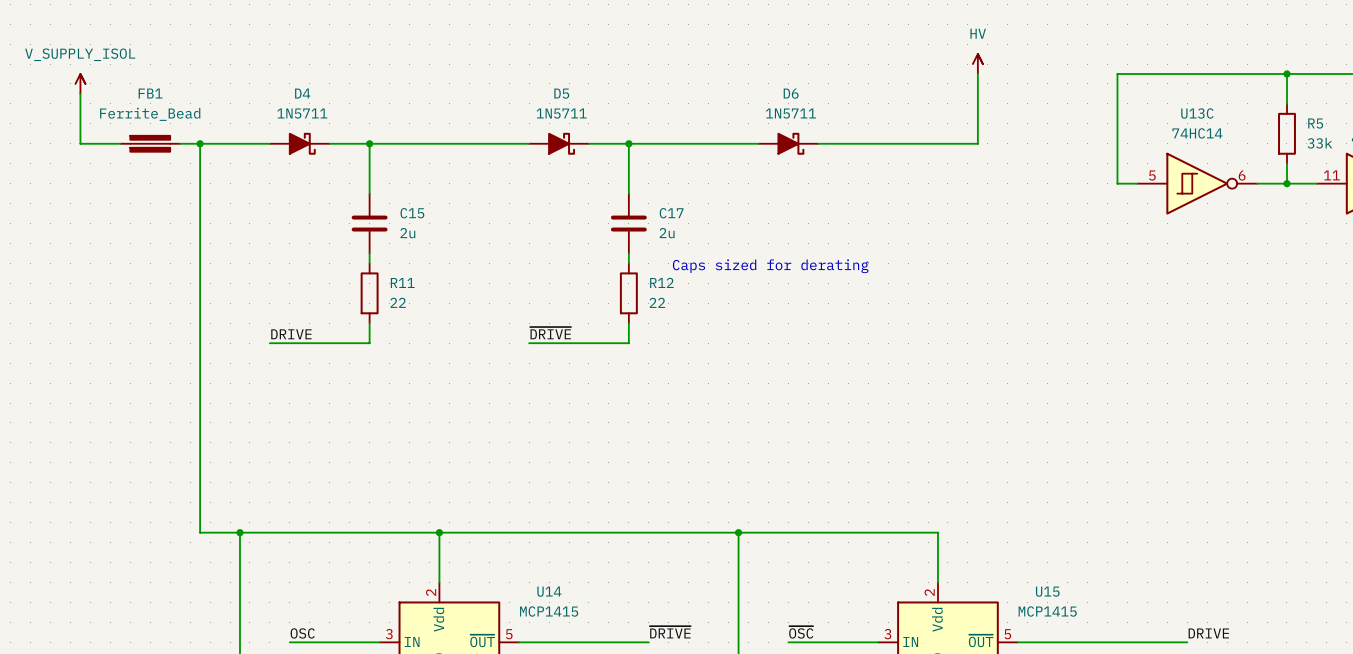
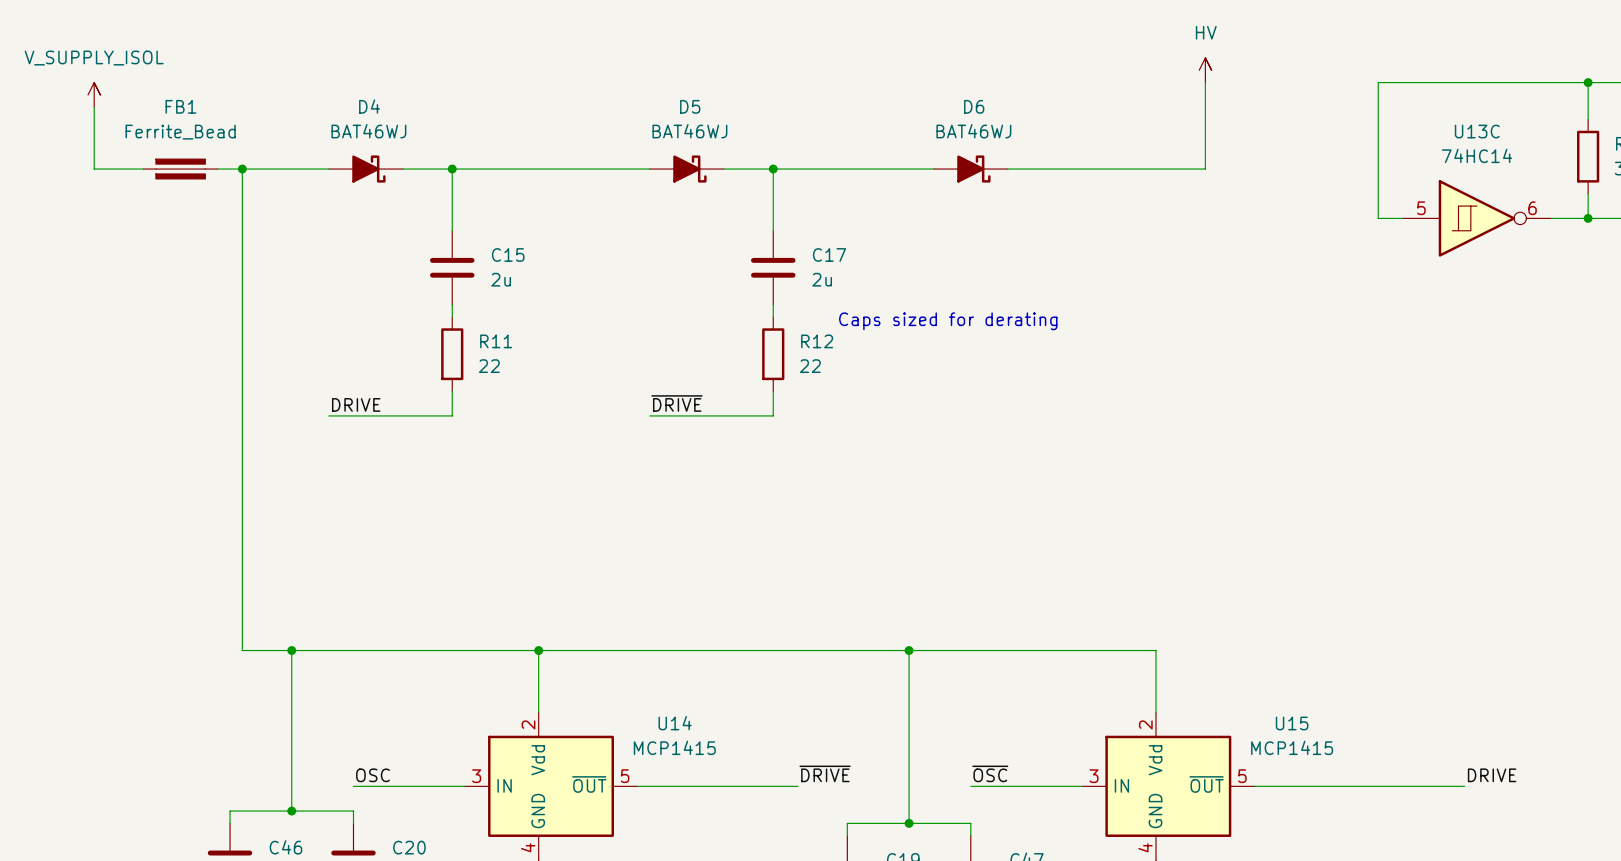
D4 value: 1N5711 (302, 113) -> BAT46WJ (368, 131)
D5 value: 1N5711 (561, 113) -> BAT46WJ (689, 131)
D6 value: 1N5711 (790, 113) -> BAT46WJ (973, 131)

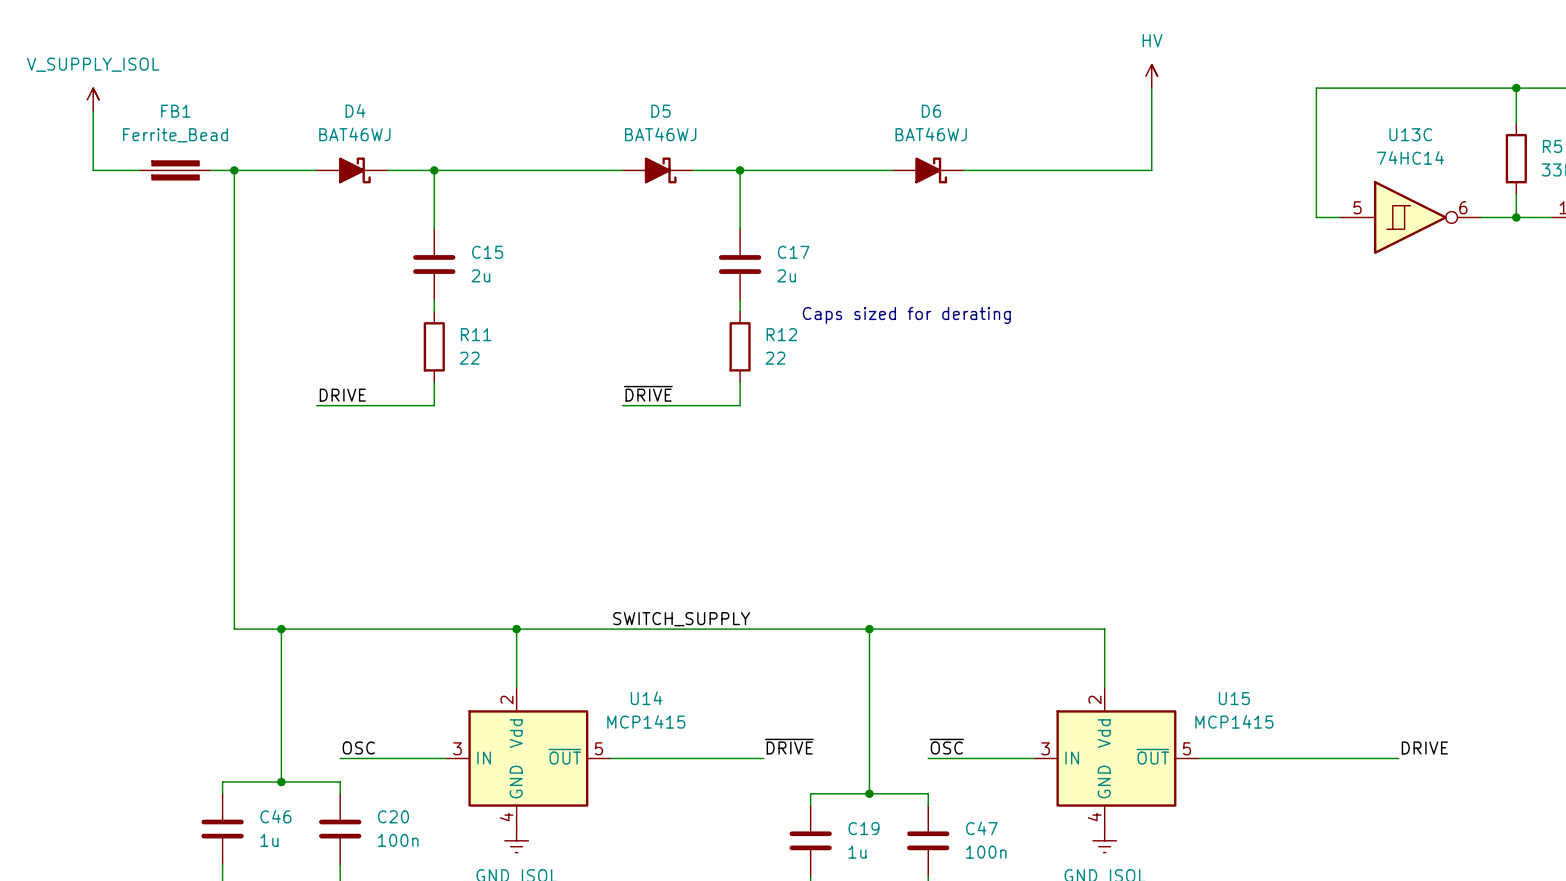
label: none -> SWITCH_SUPPLY (681, 619)

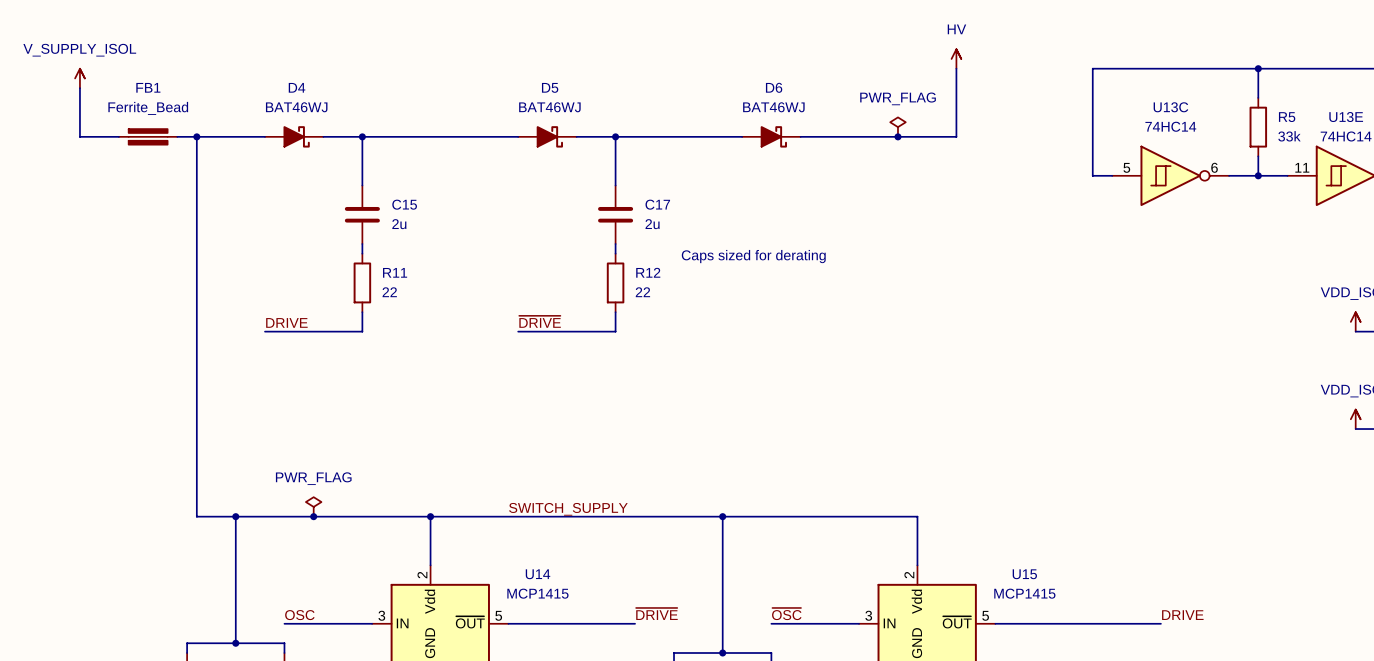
power symbol: none -> PWR_FLAG (897, 127)
junction: none -> (897, 136)
power symbol: none -> PWR_FLAG (313, 506)
junction: none -> (313, 516)

